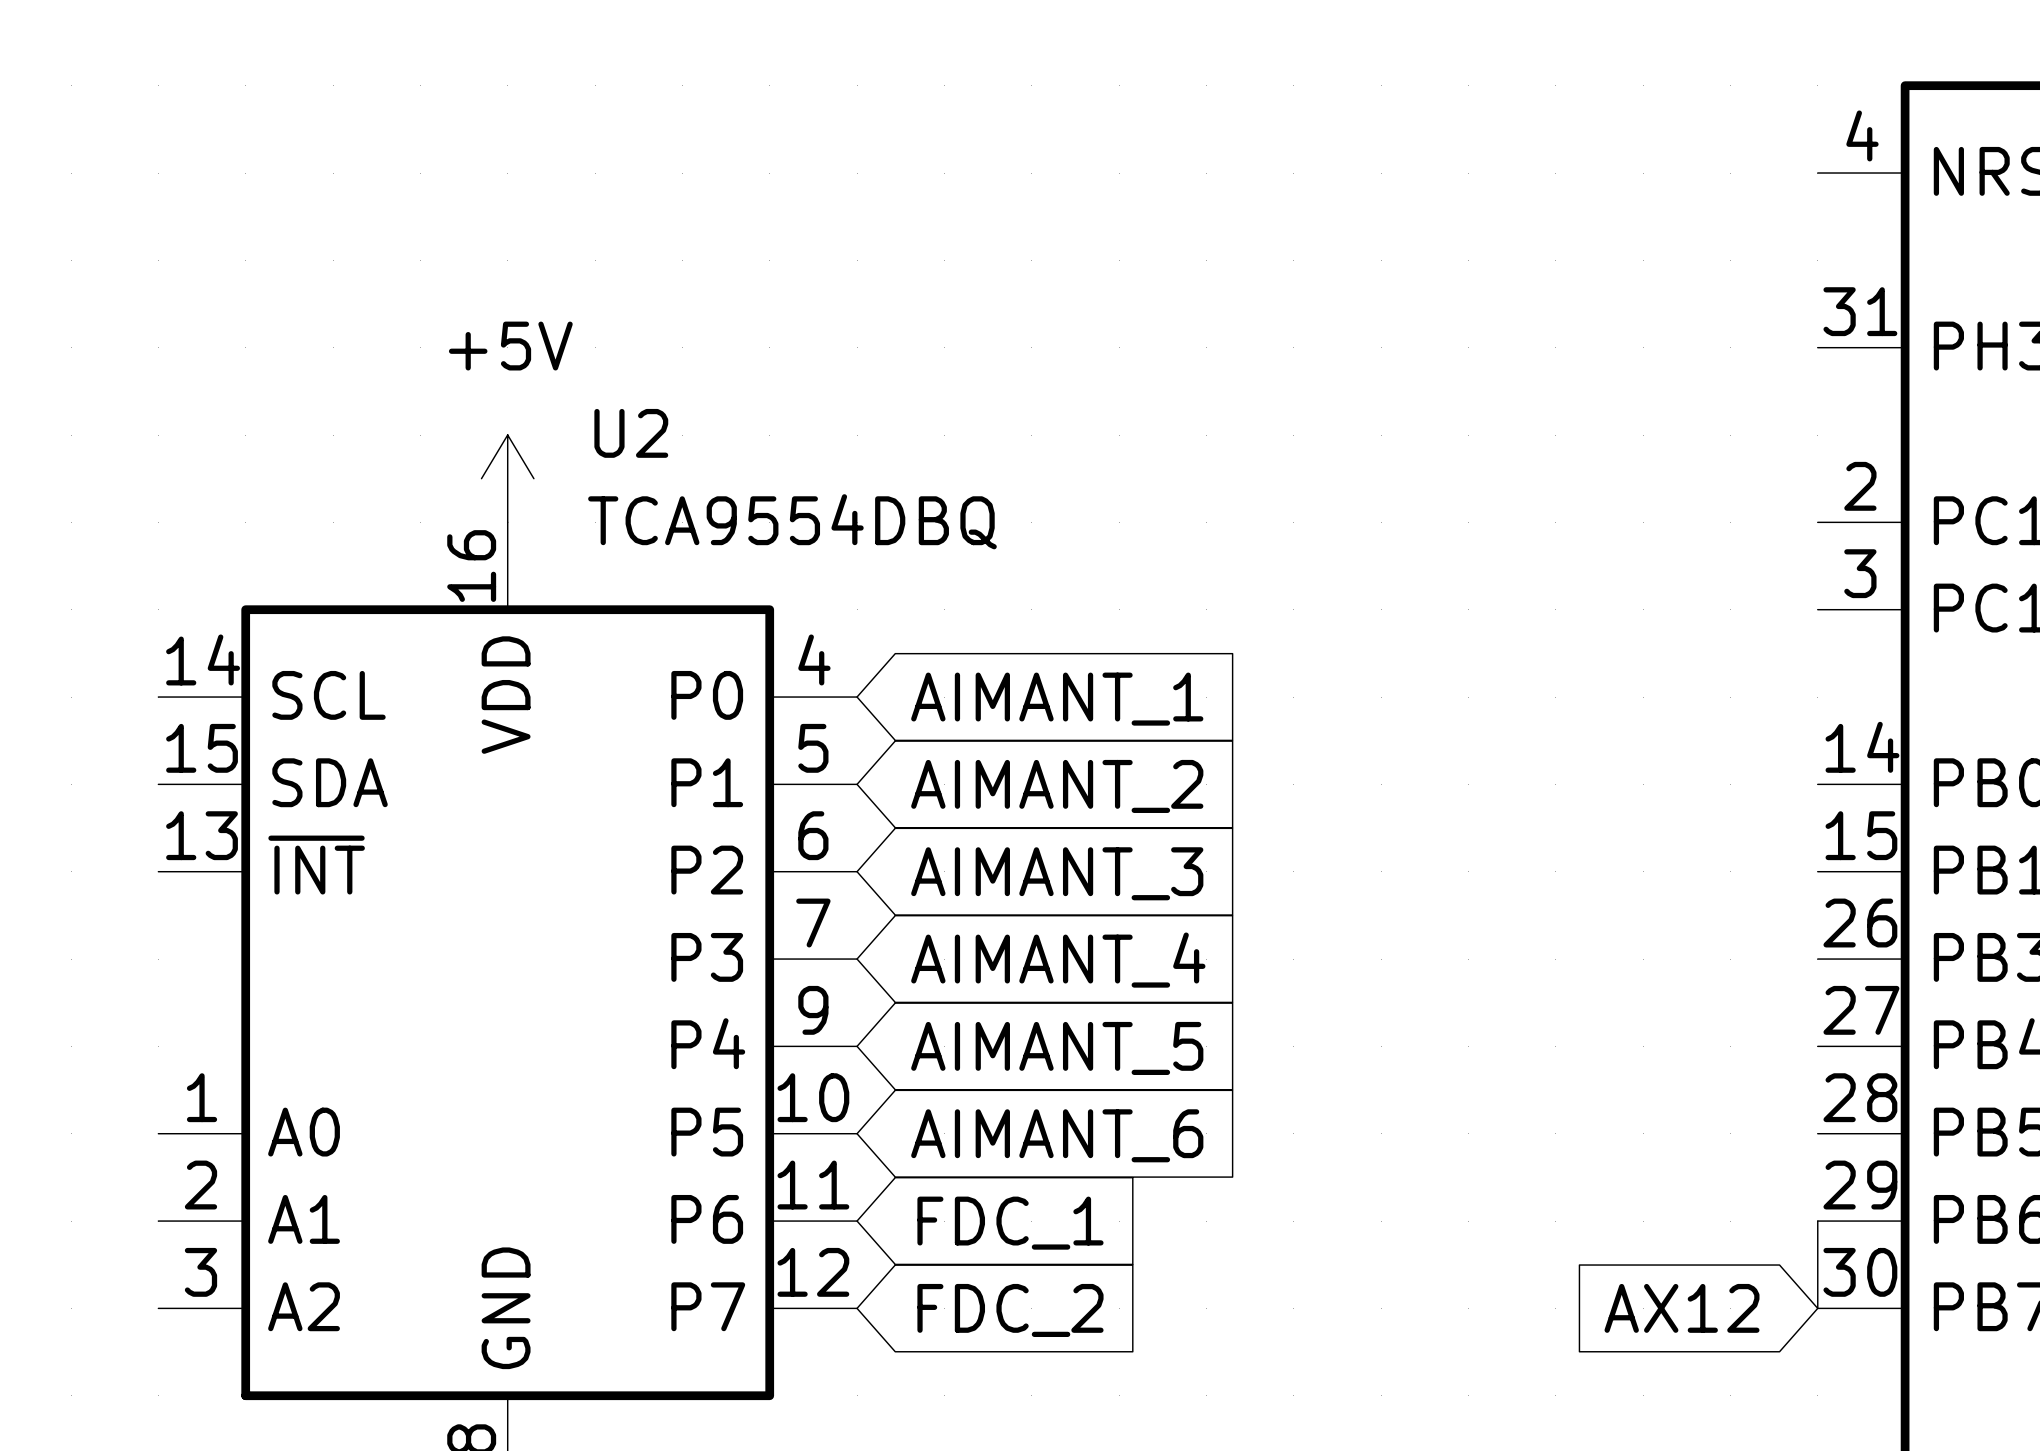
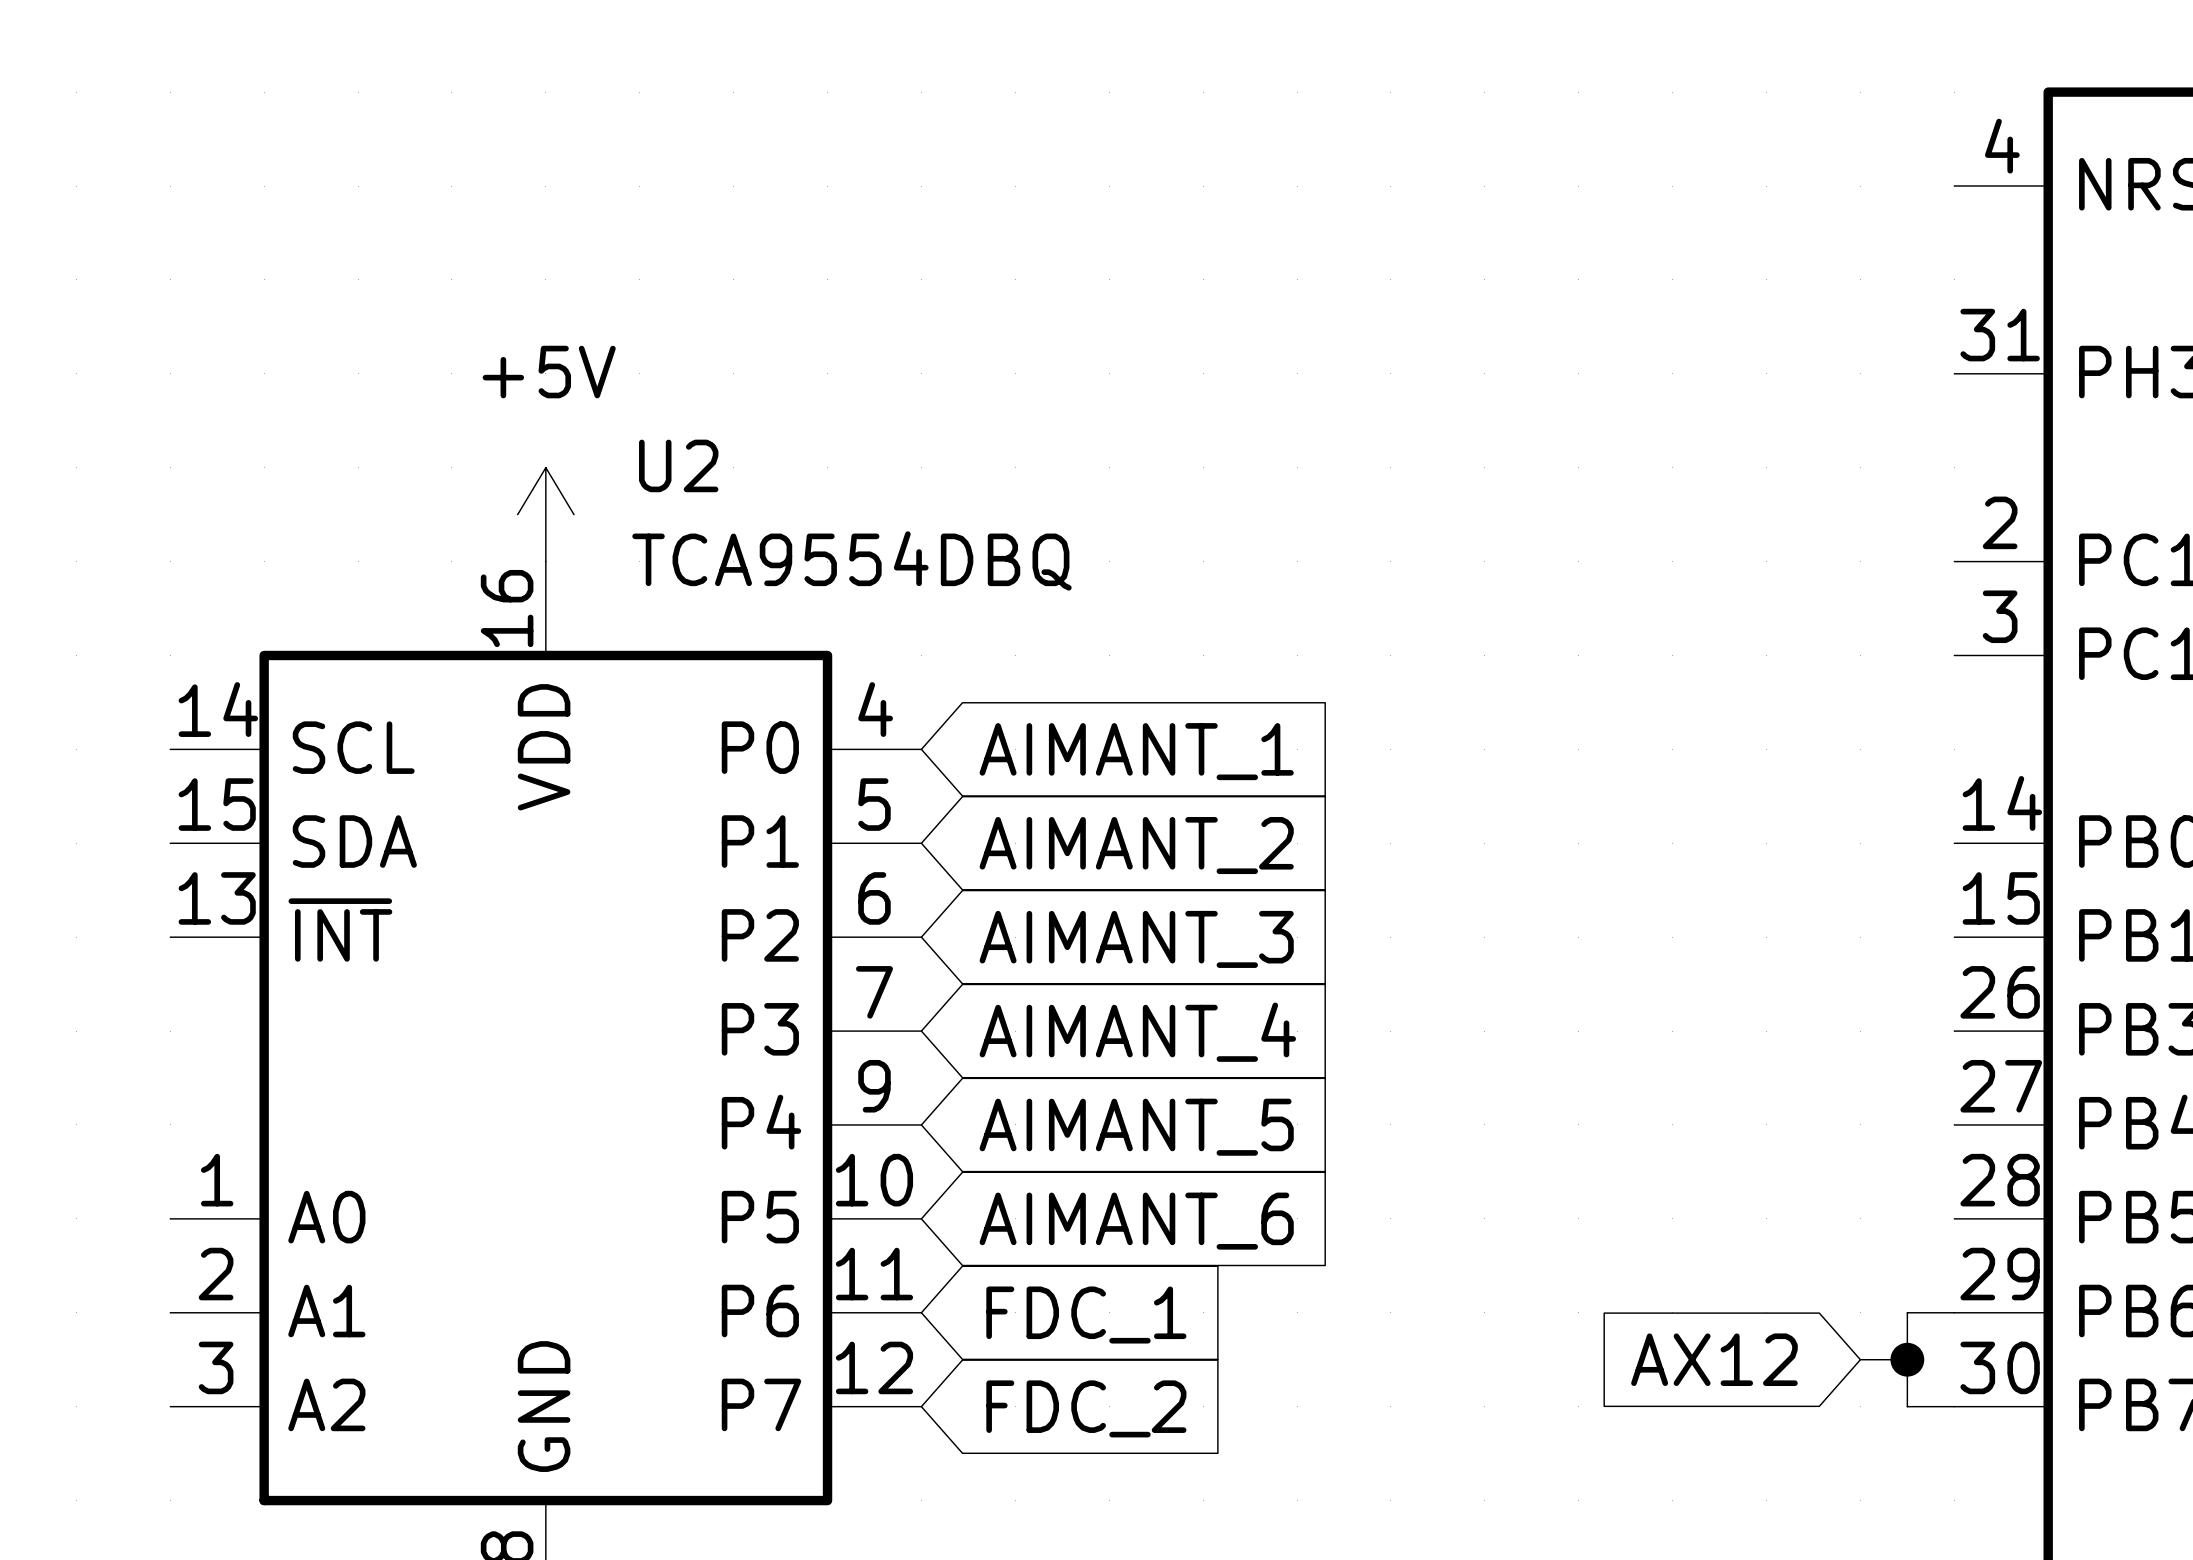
wire: (1817, 1221) (1817, 1308) -> (1954, 1312) (1907, 1312) (1907, 1406) (1954, 1406)
wire: none -> (1860, 1359) (1907, 1359)
junction: none -> (1907, 1359)
global label position: AX12 (1682, 1308) -> AX12 (1714, 1359)

